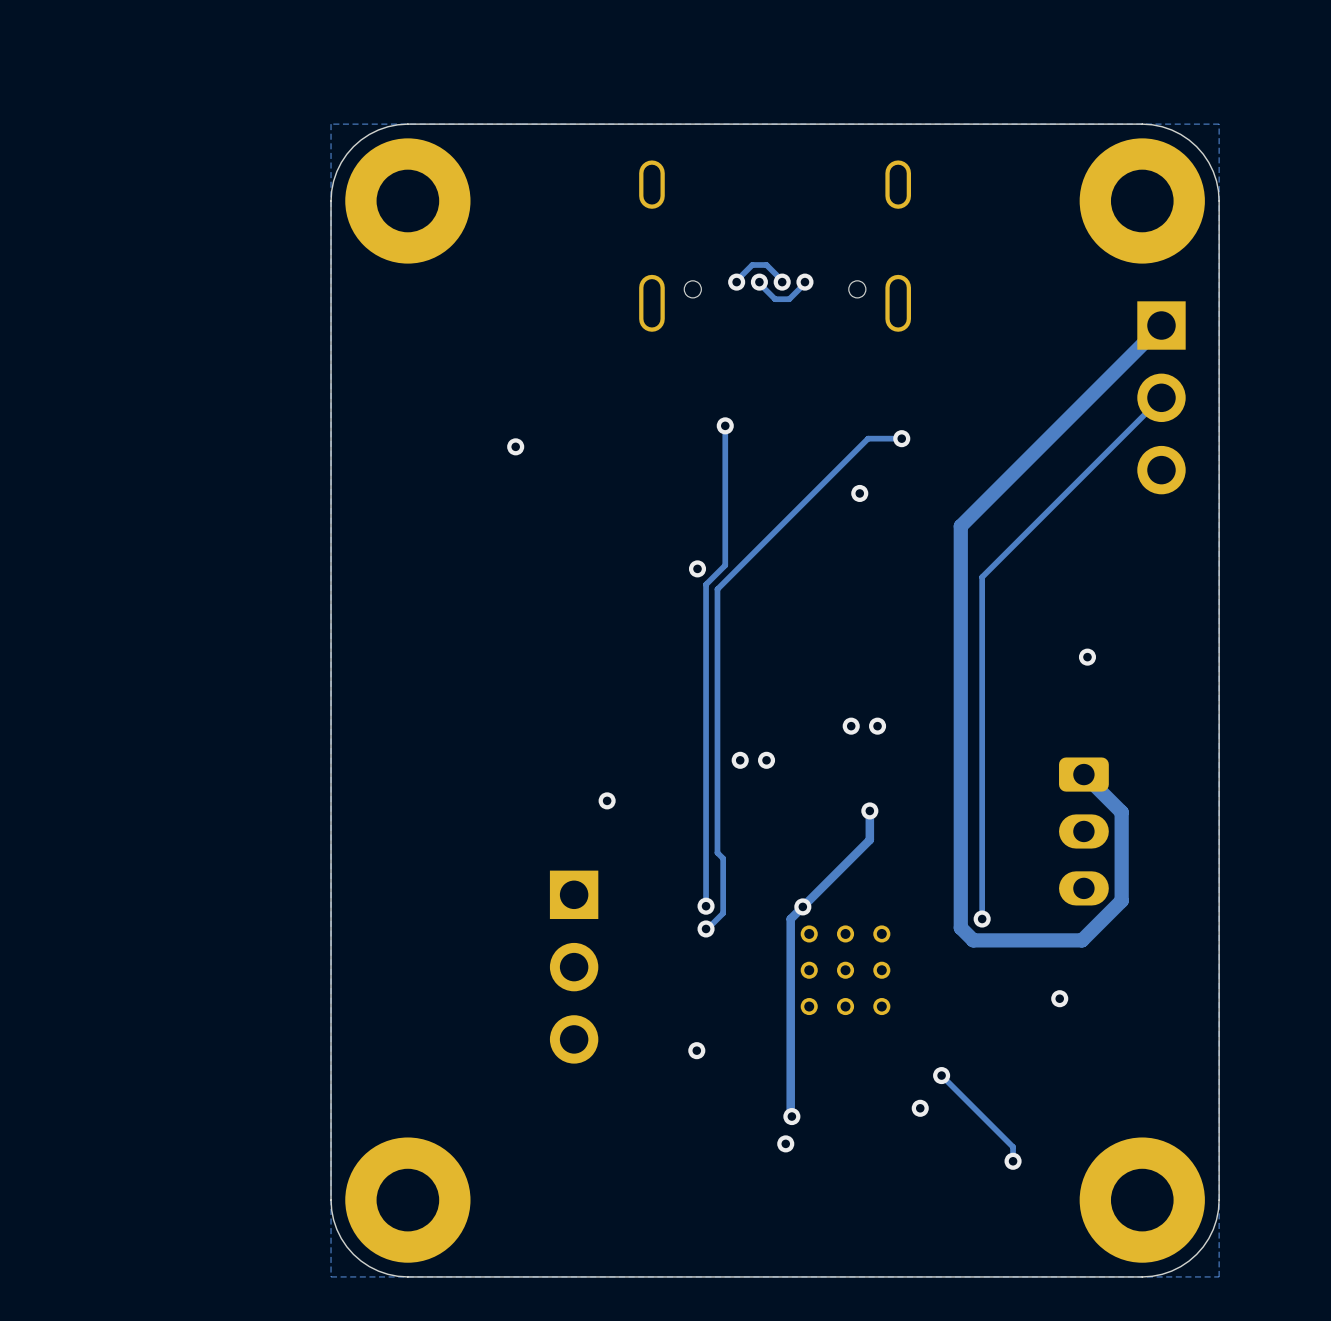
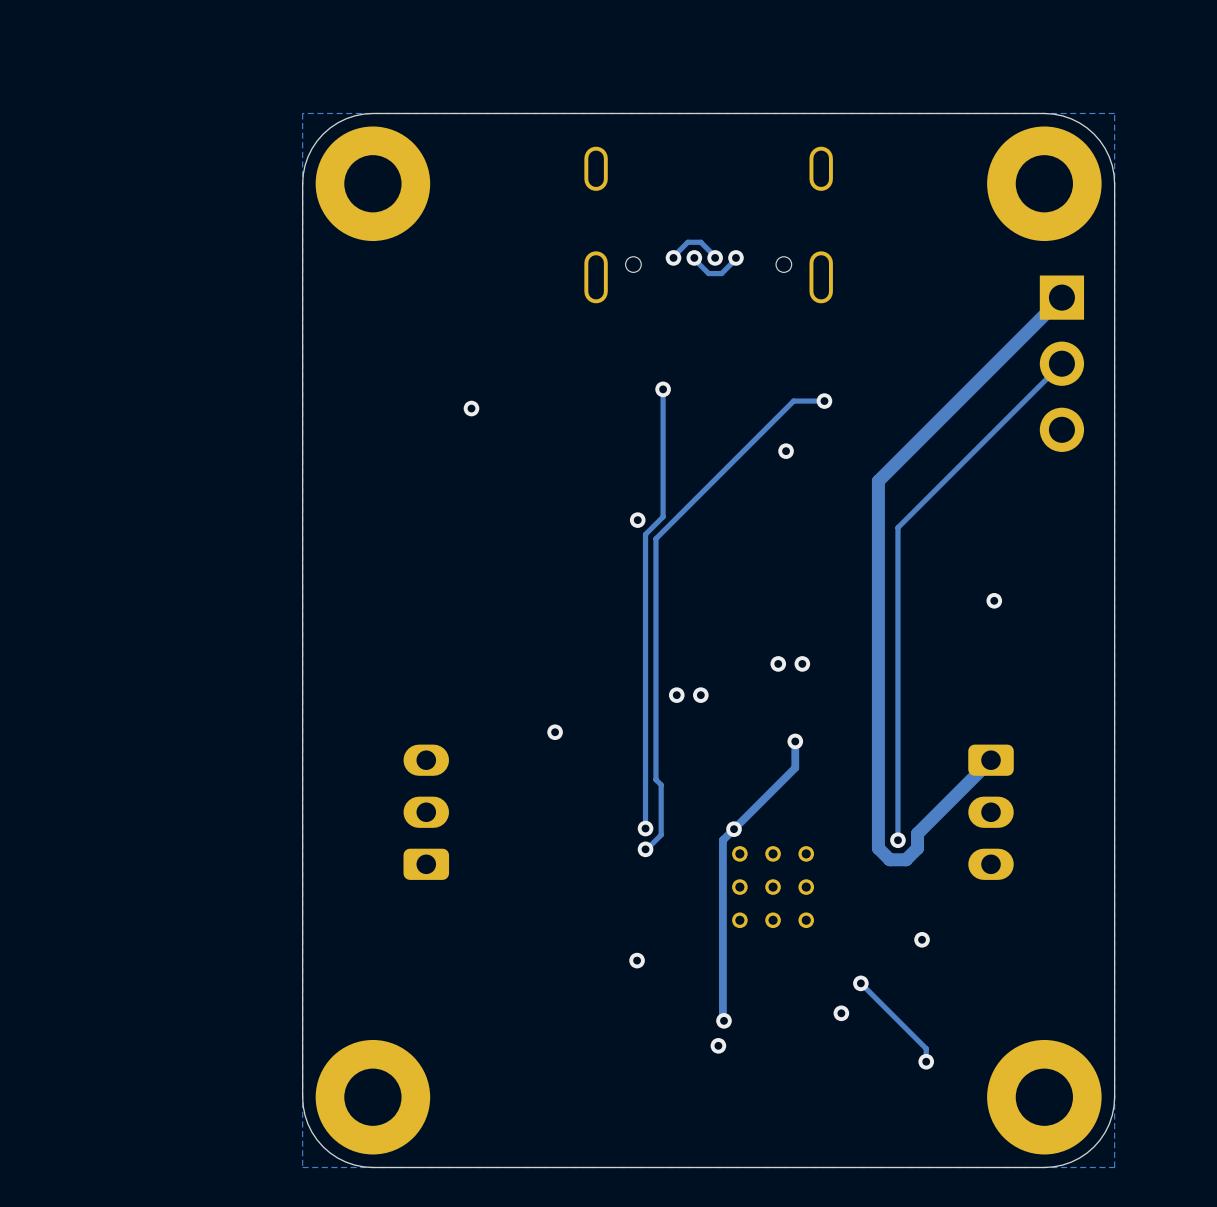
track: (1083, 774) (1121, 812) (1121, 900) (1082, 940) (991, 940) -> (991, 760) (917, 833) (917, 848) (906, 859)
part position: (1083, 831) -> (991, 812)
part: none -> (426, 812)
part: (574, 967) -> none
via position: (1059, 998) -> (922, 939)

